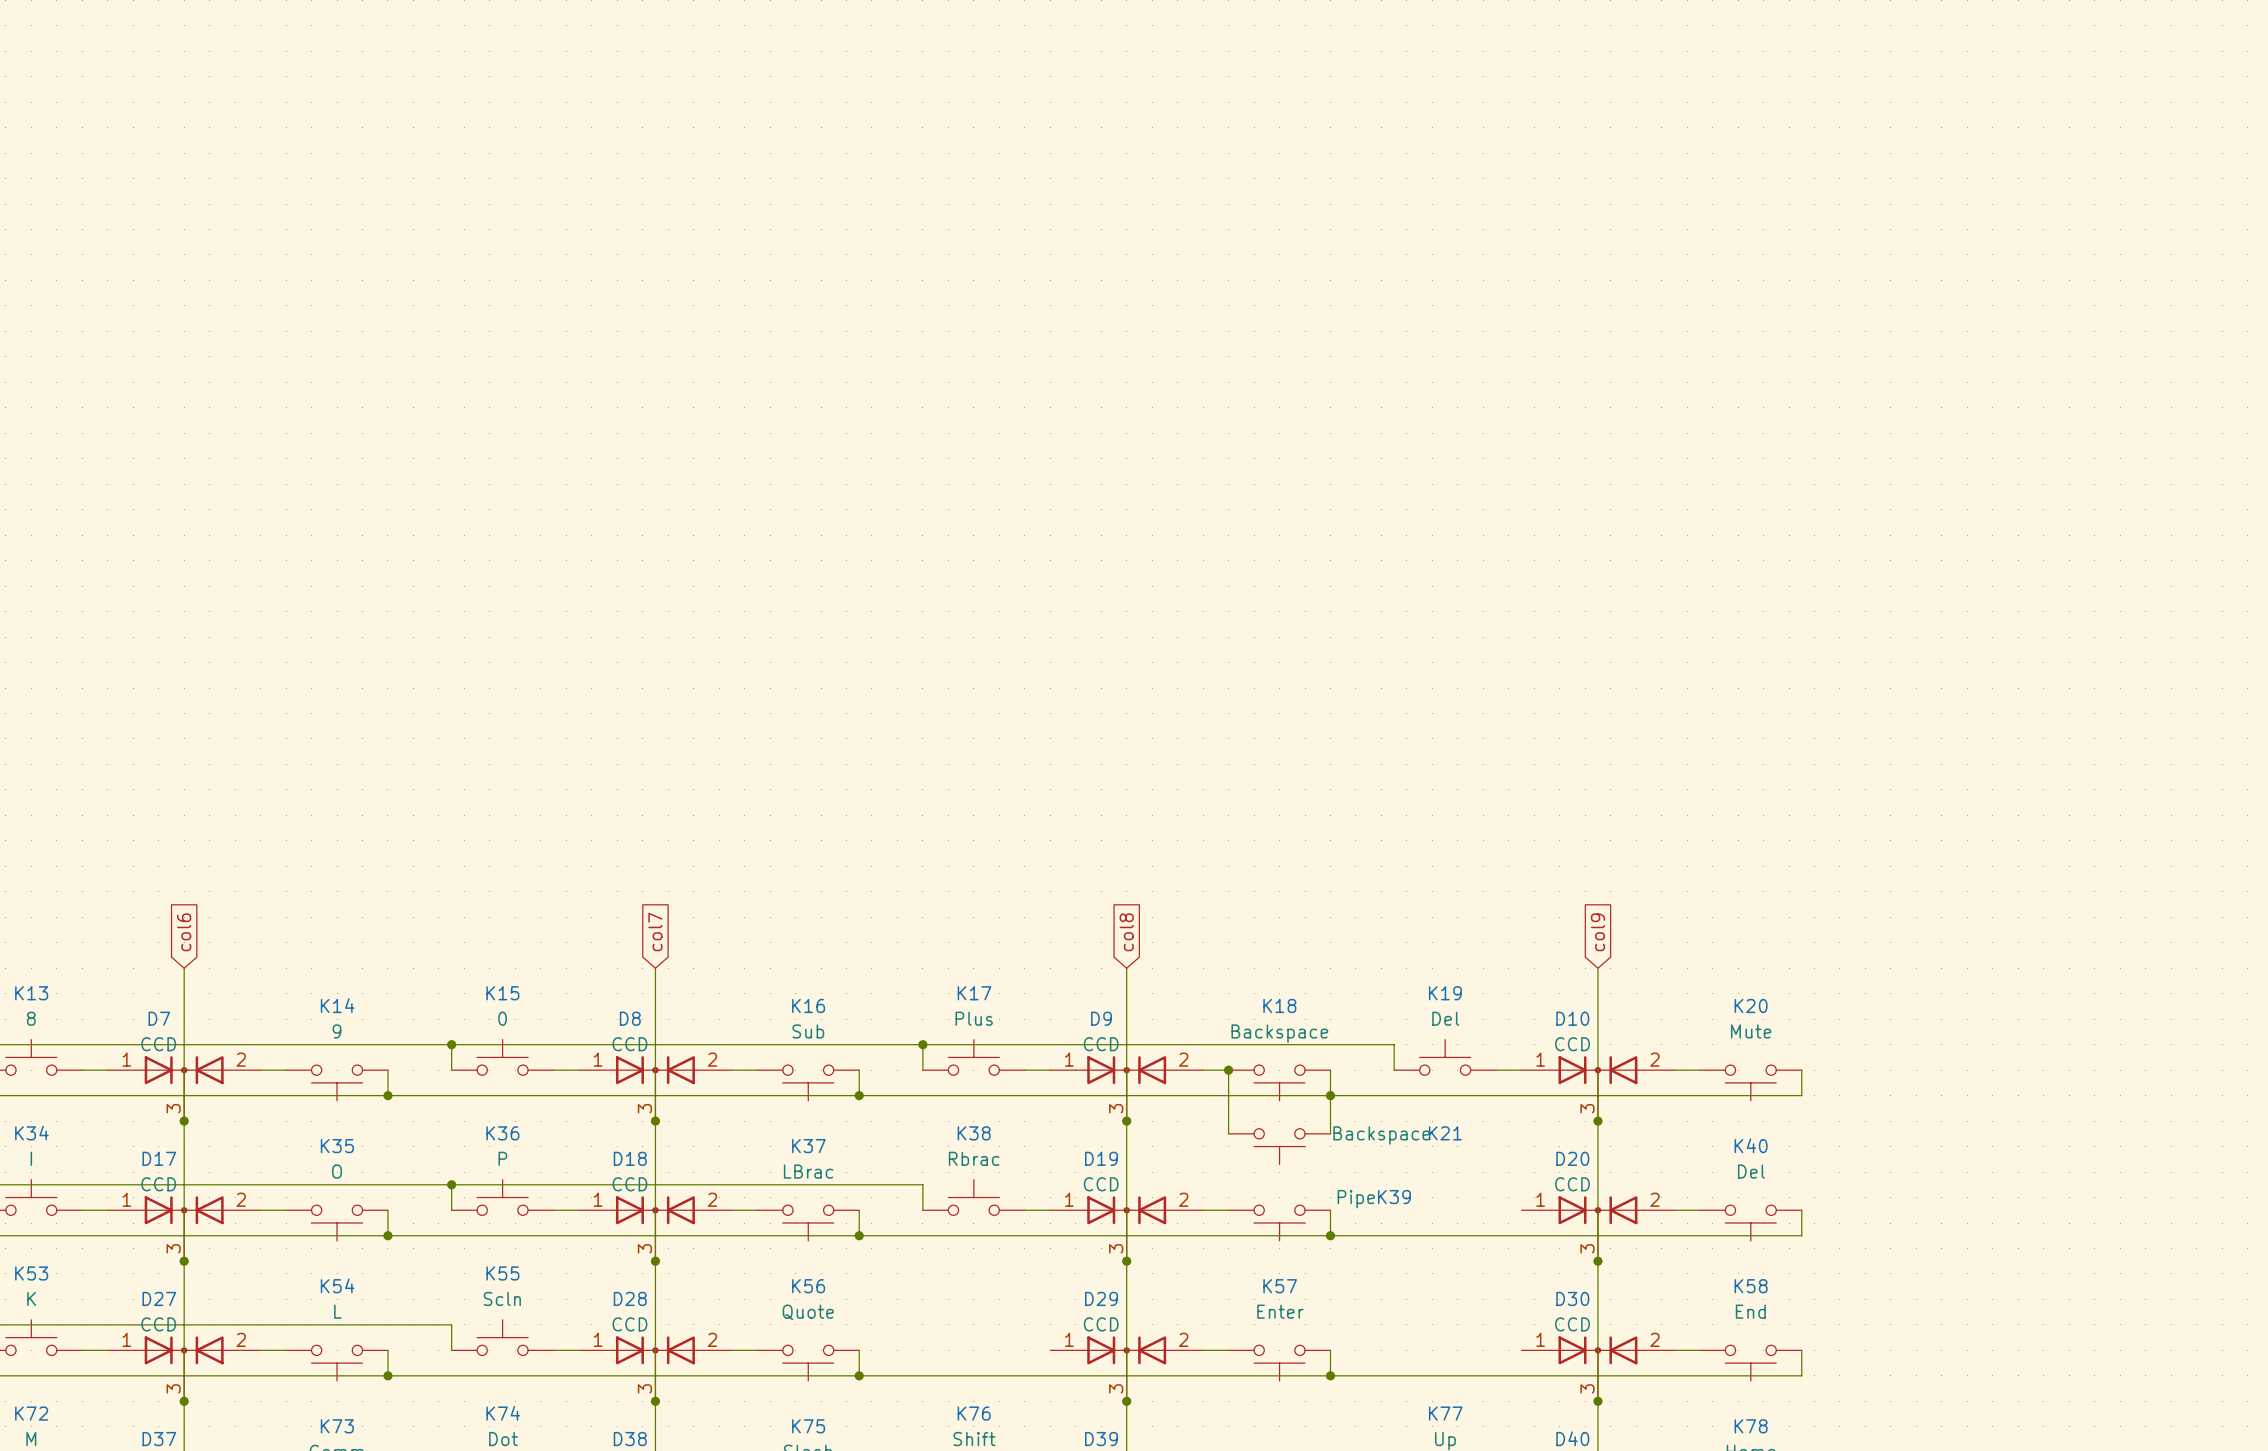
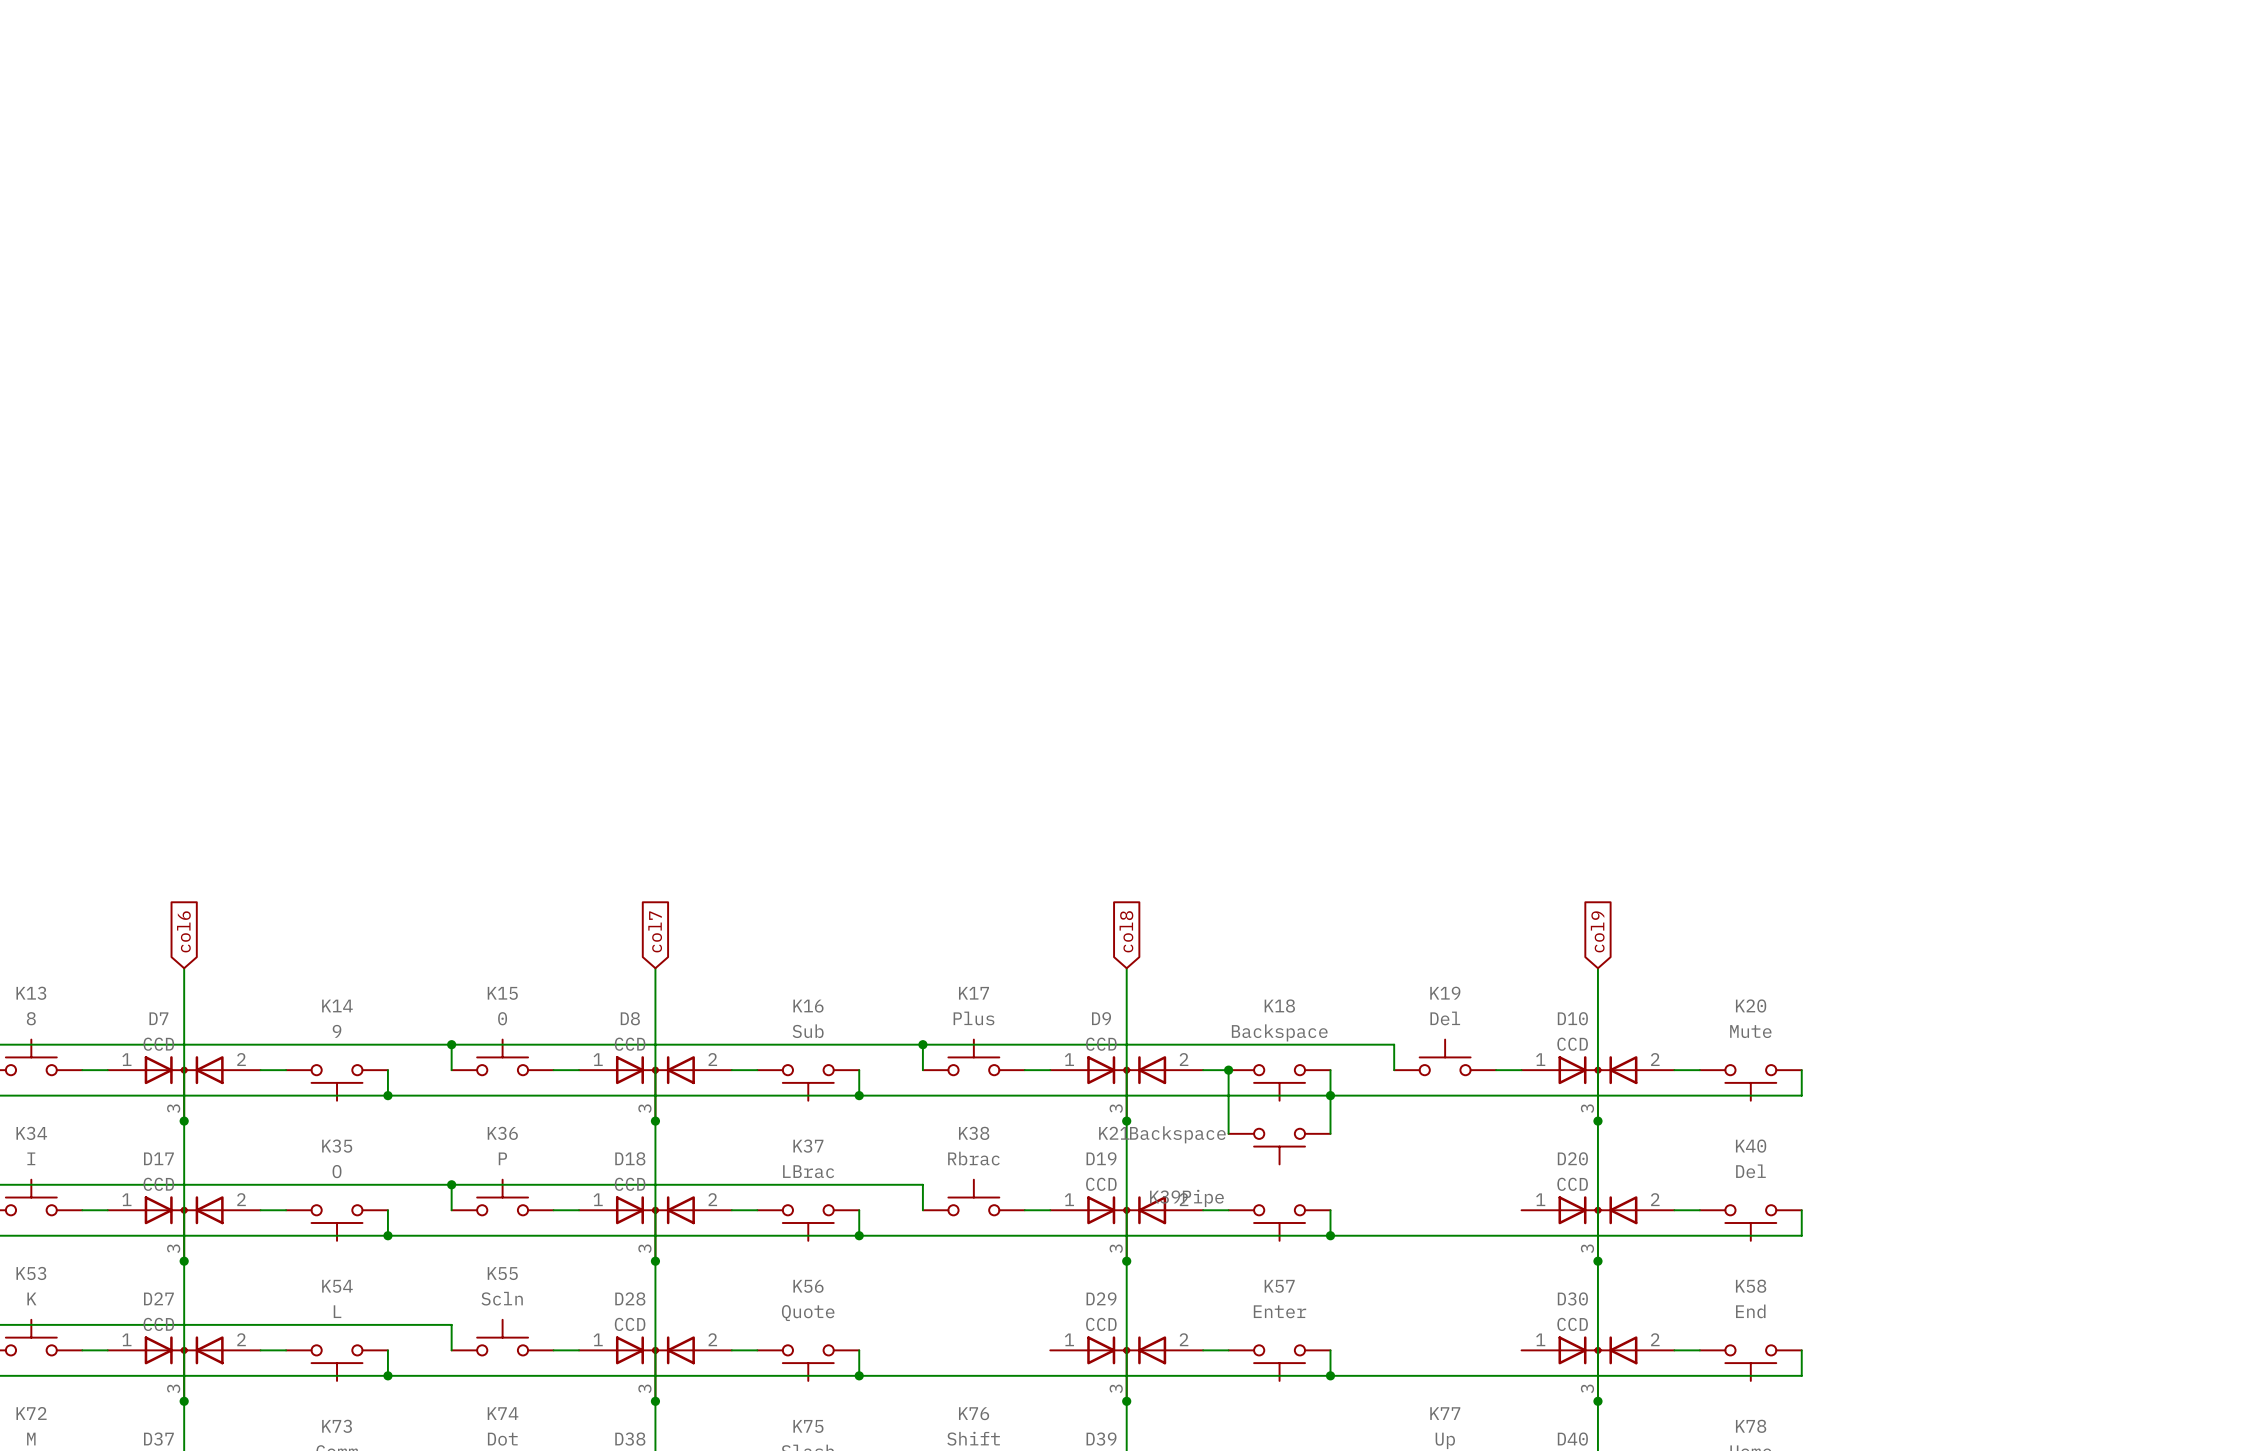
K21 name position: K21 (1445, 1133) -> K21 (1114, 1133)
K21 value position: Backspace (1381, 1135) -> Backspace (1177, 1134)
K39 name position: K39 (1394, 1197) -> K39 (1165, 1197)
K39 value position: Pipe (1356, 1199) -> Pipe (1203, 1198)

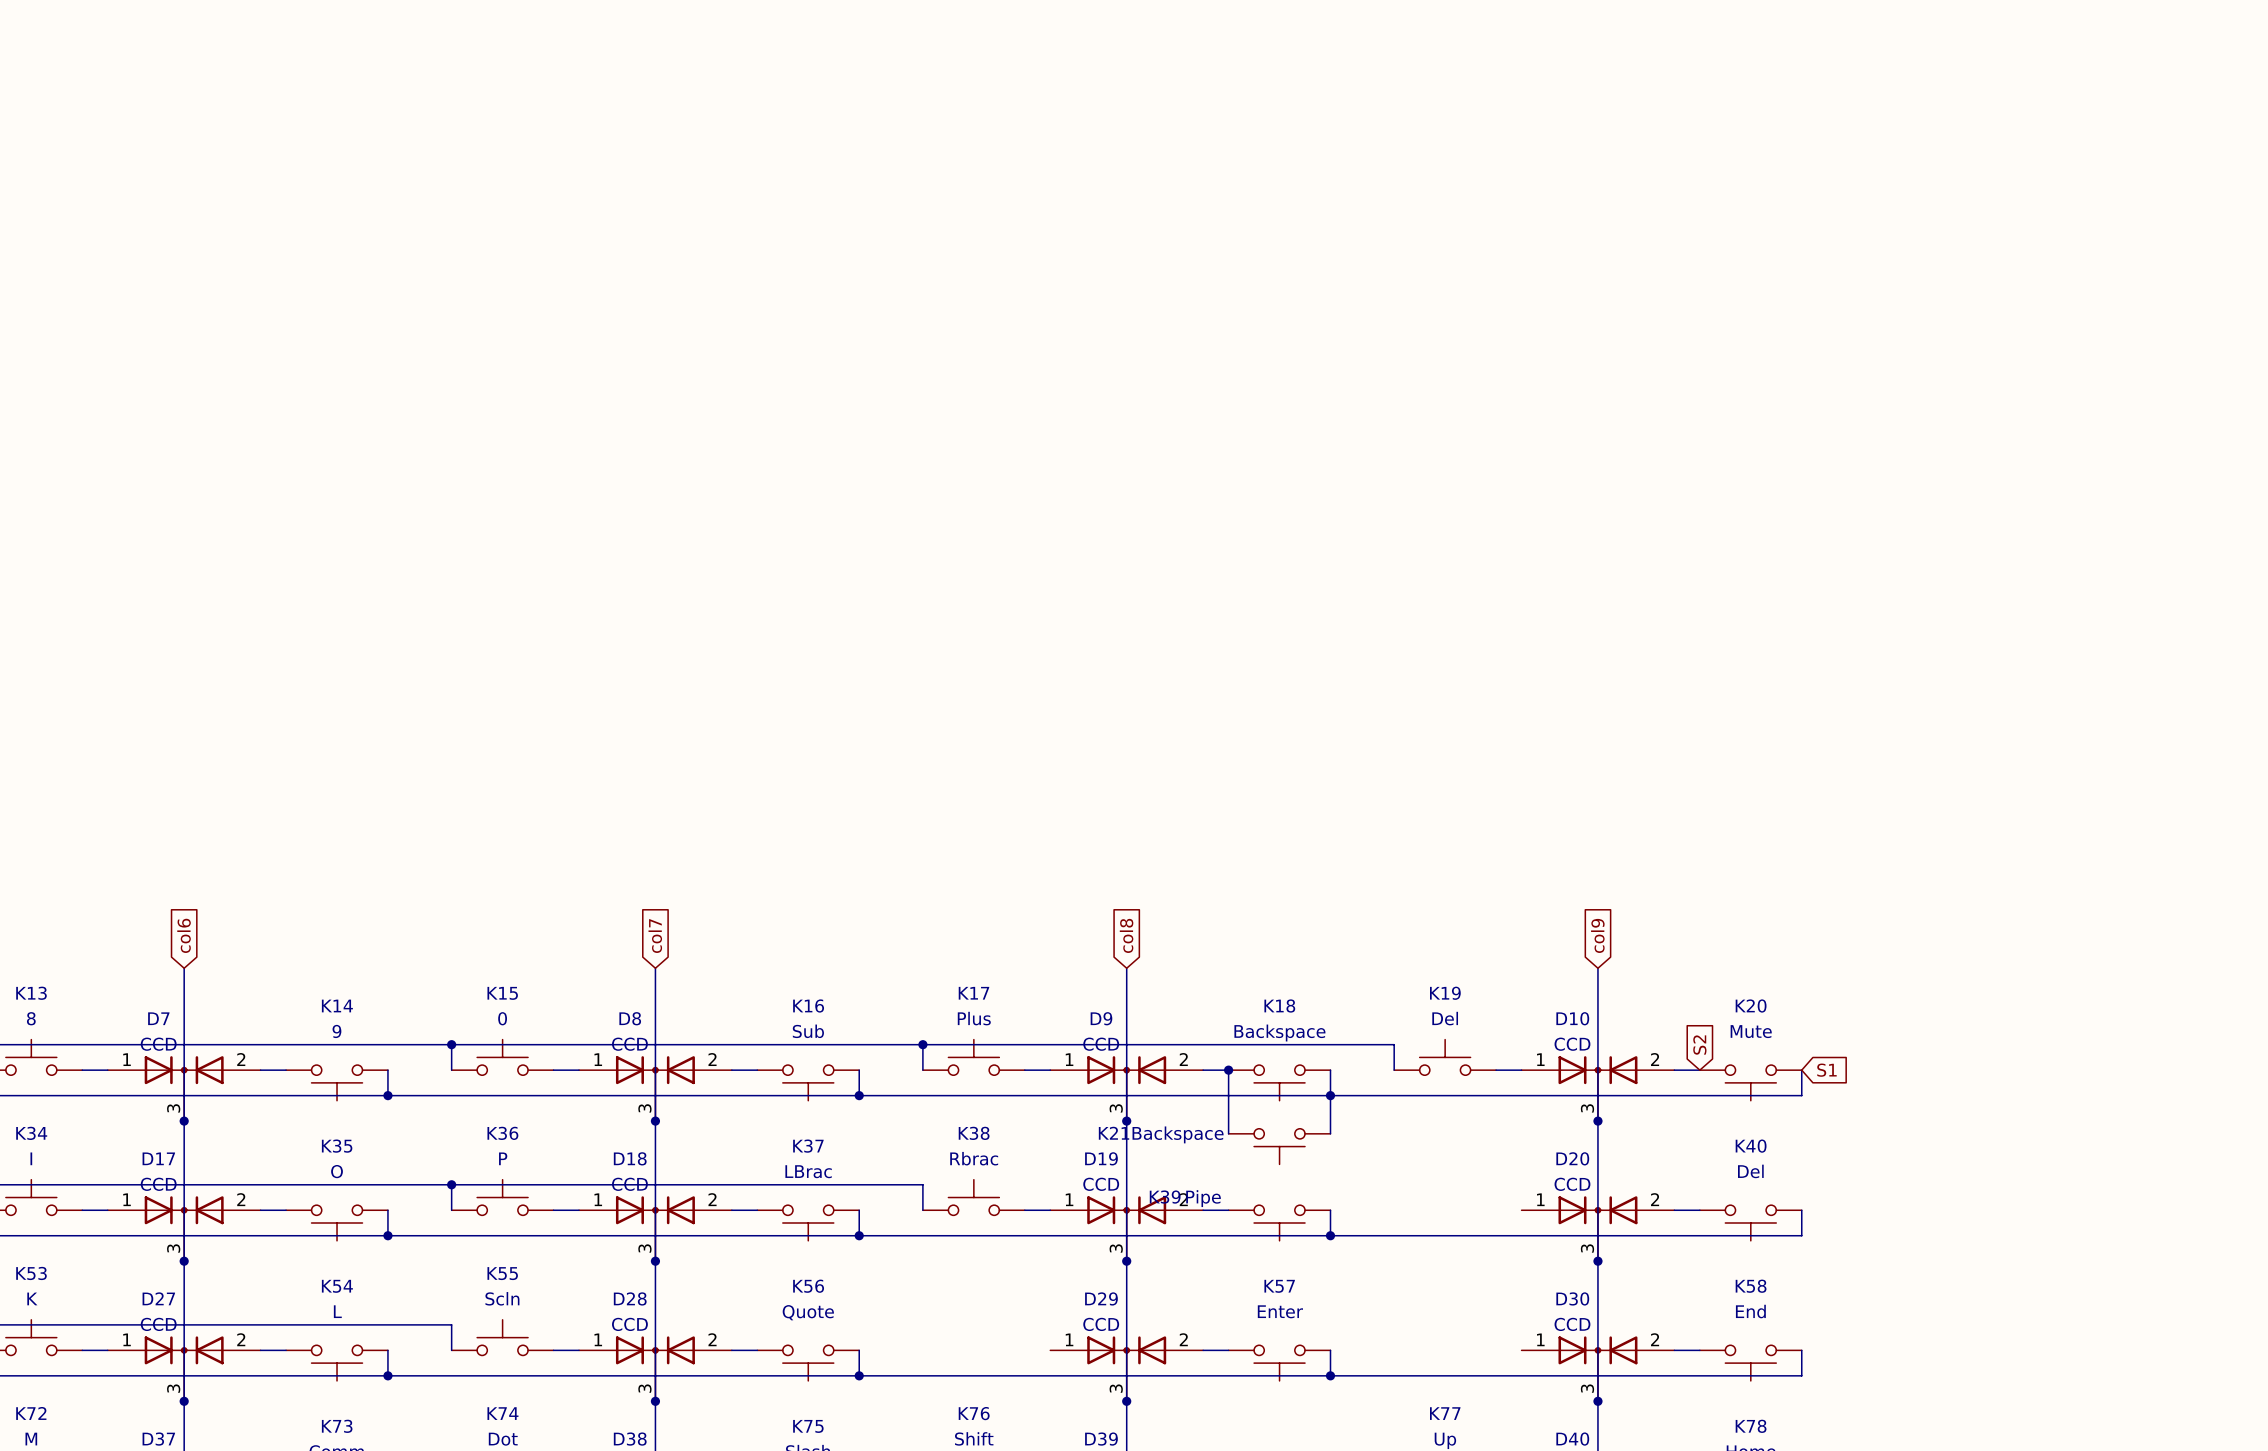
global label: none -> S2 (1699, 1045)
global label: none -> S1 (1826, 1070)

